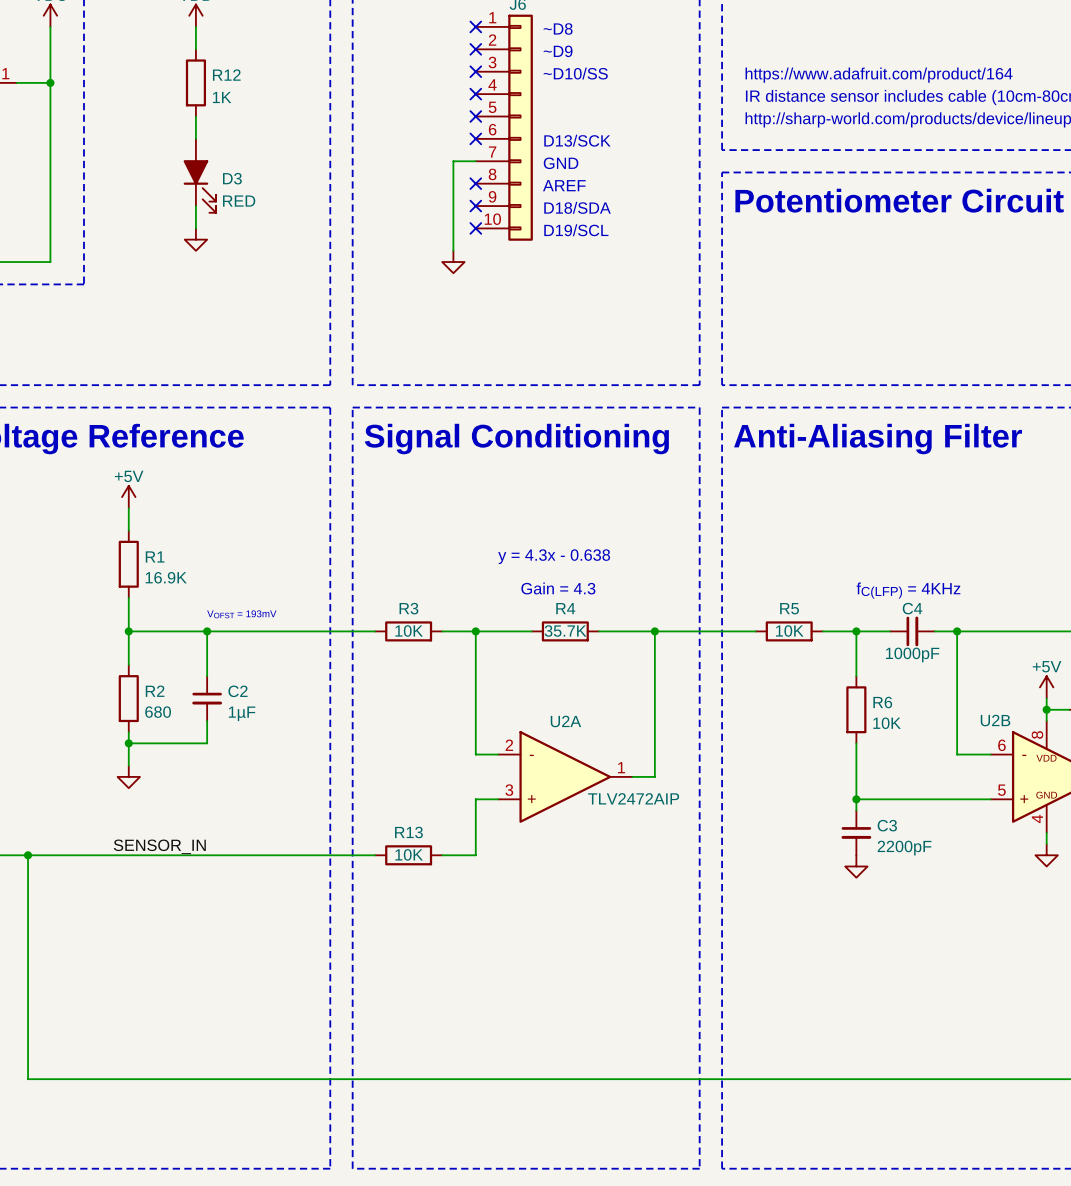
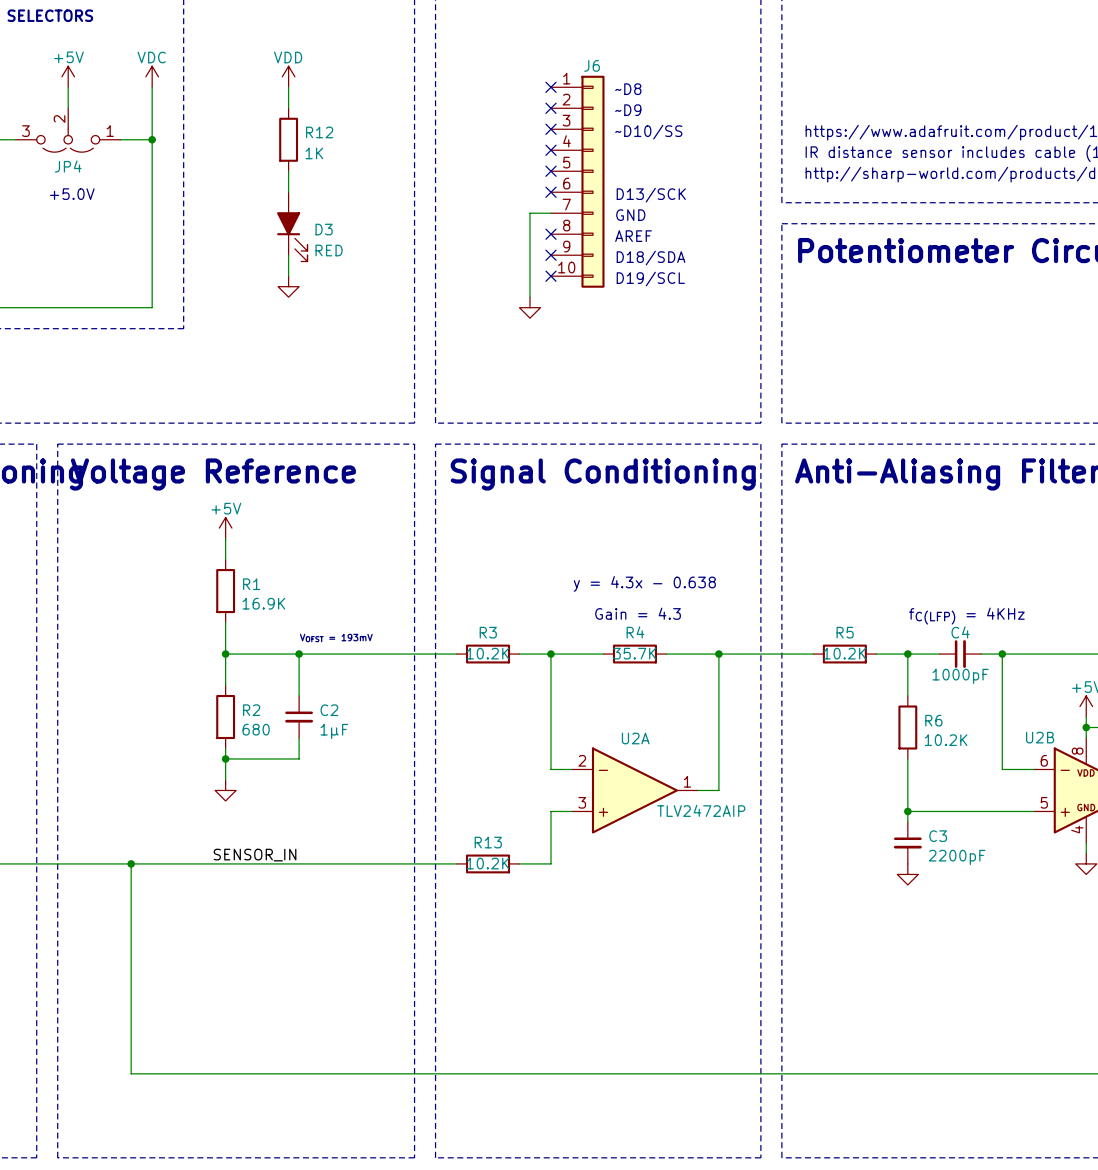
R3 value: 10K (409, 630) -> 10.2K (488, 653)
R5 value: 10K (789, 630) -> 10.2K (844, 653)
R6 value: 10K (887, 723) -> 10.2K (946, 740)
R13 value: 10K (409, 854) -> 10.2K (488, 863)

